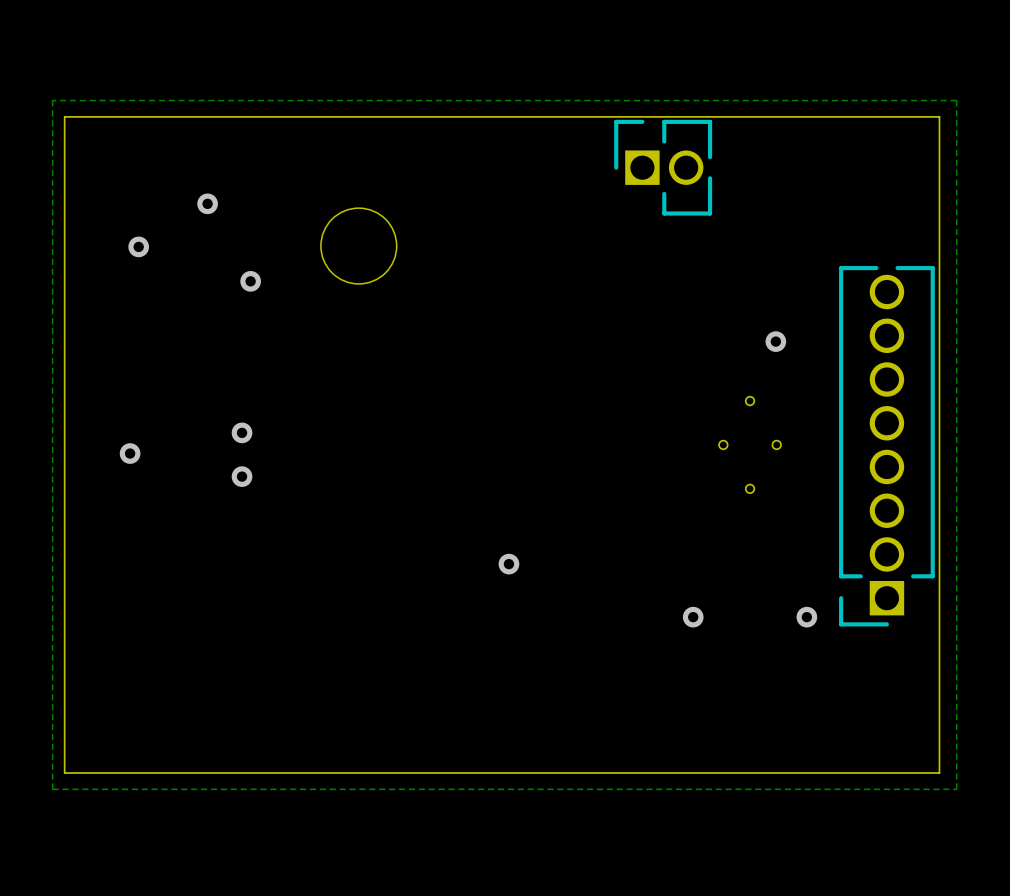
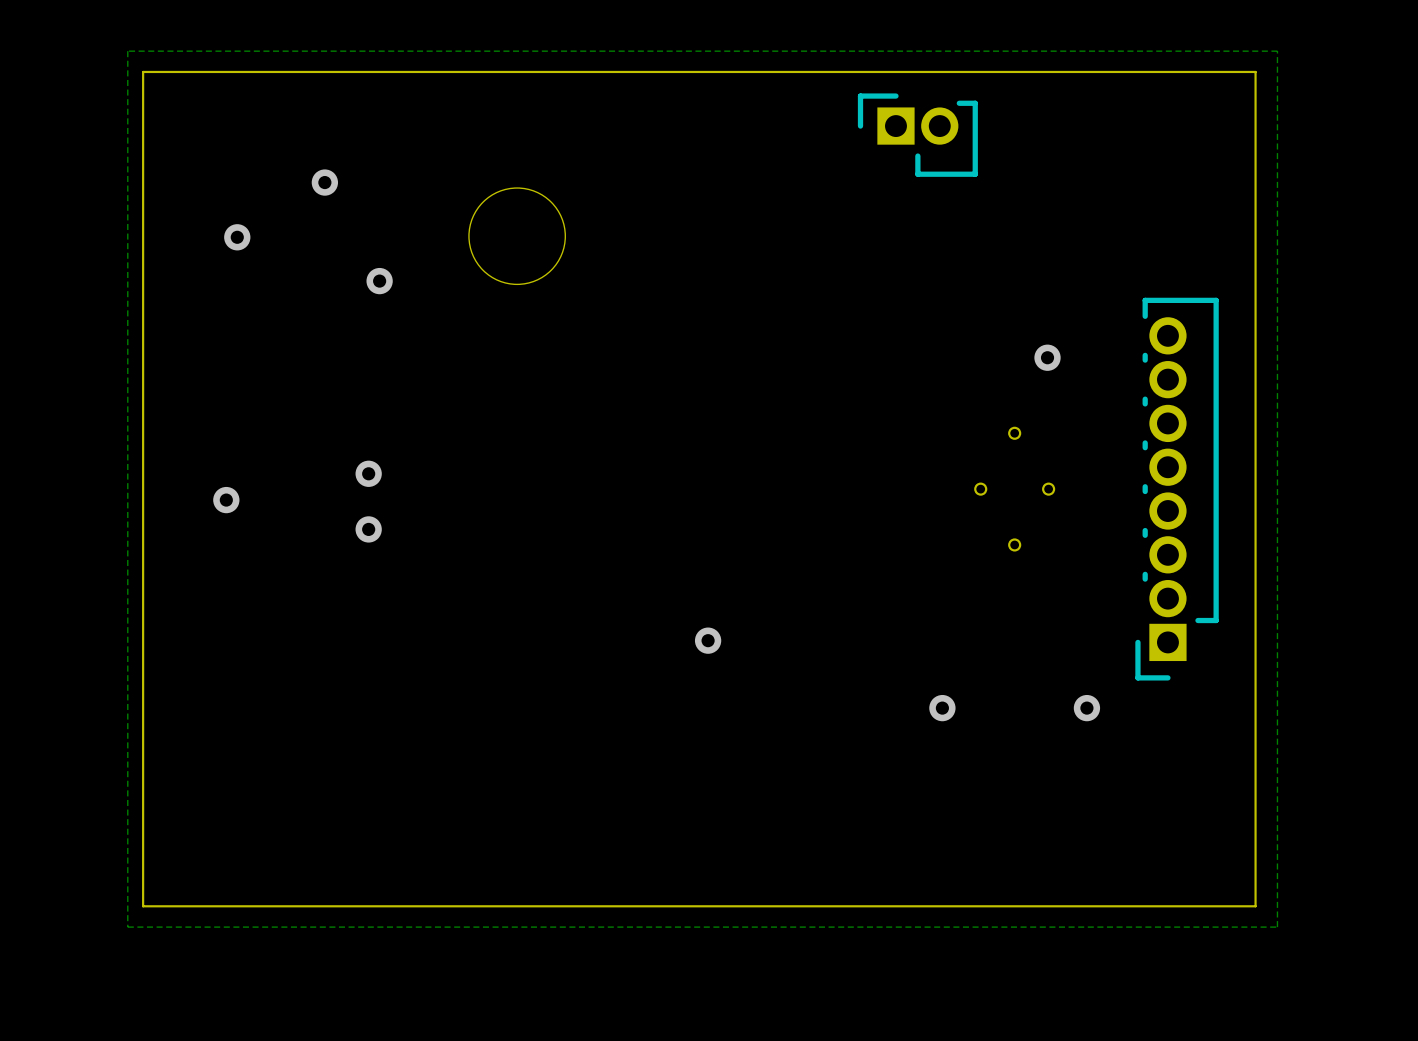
part footprint: [614, 119, 713, 216] -> [857, 93, 978, 177]
part footprint: [839, 266, 935, 627] -> [1135, 297, 1219, 681]

